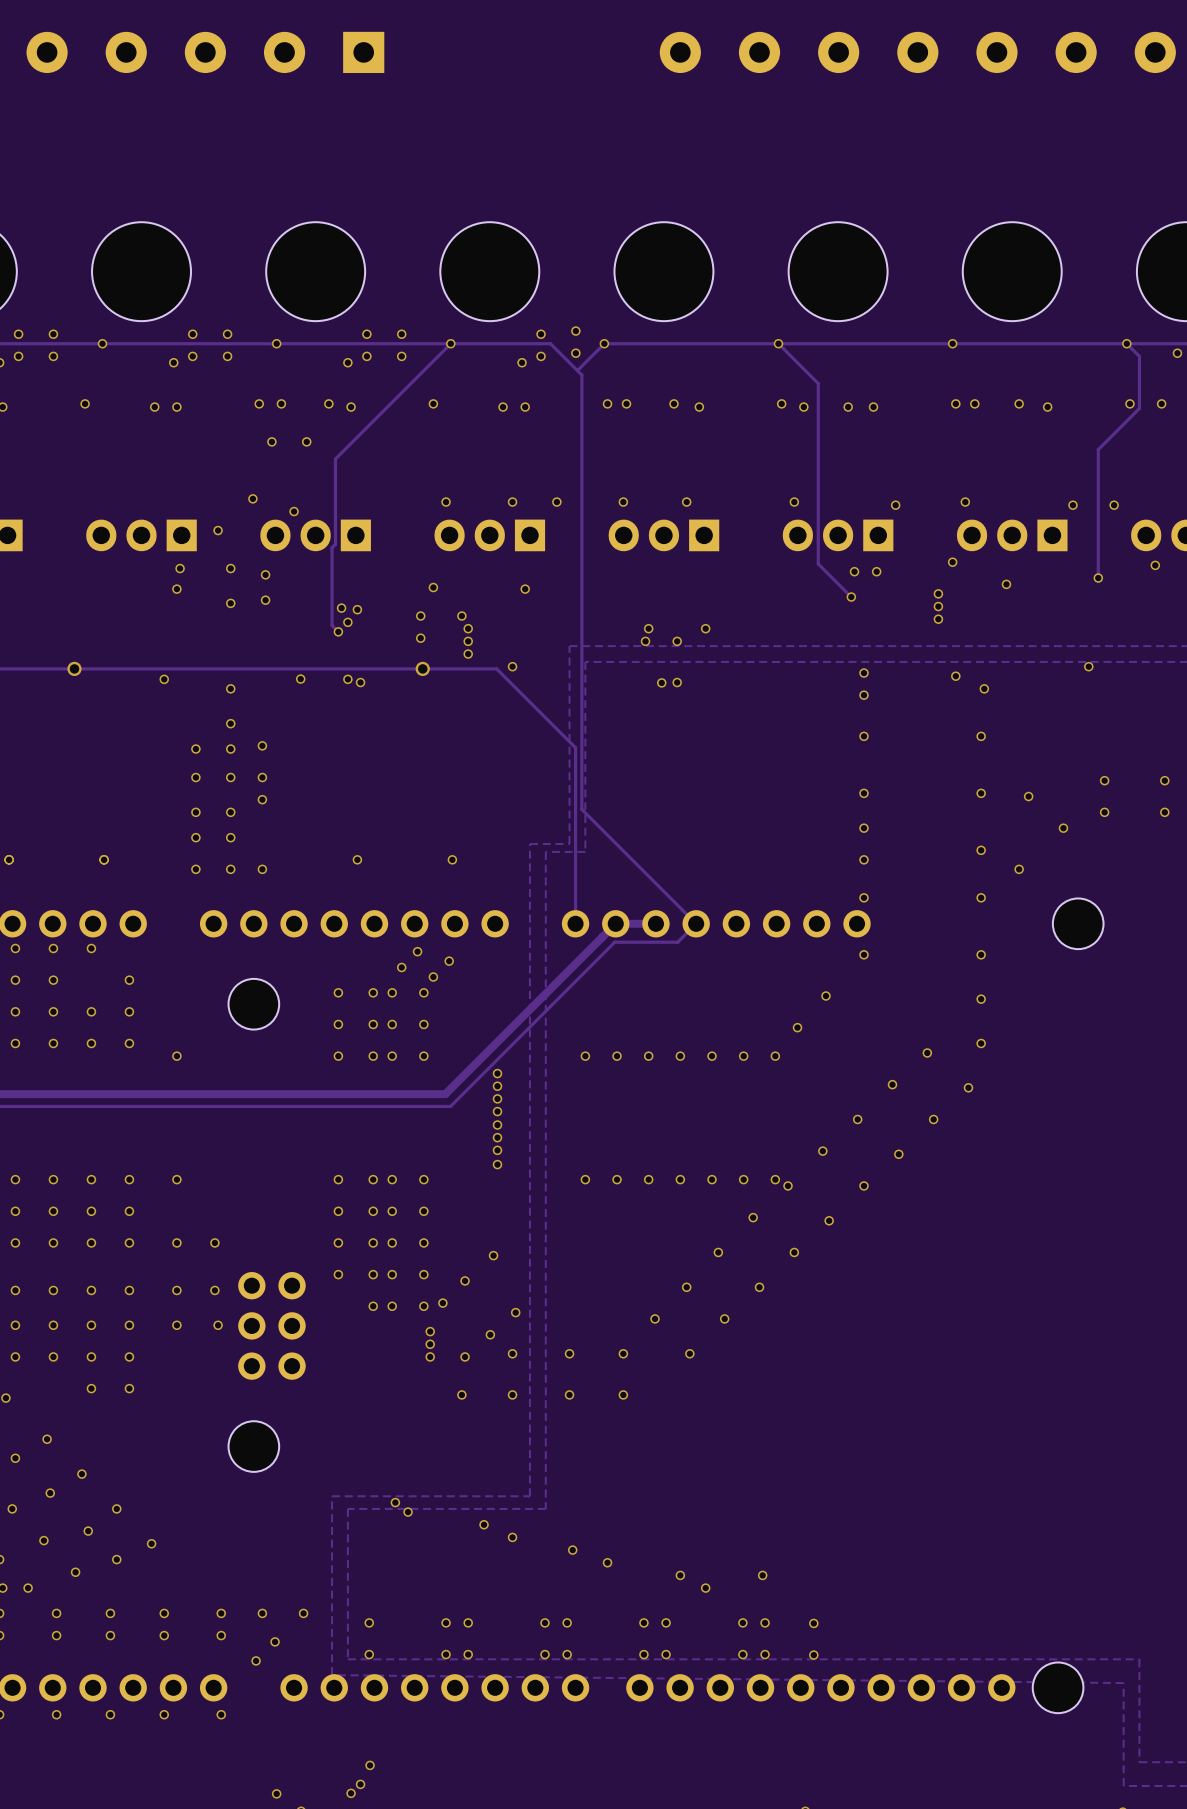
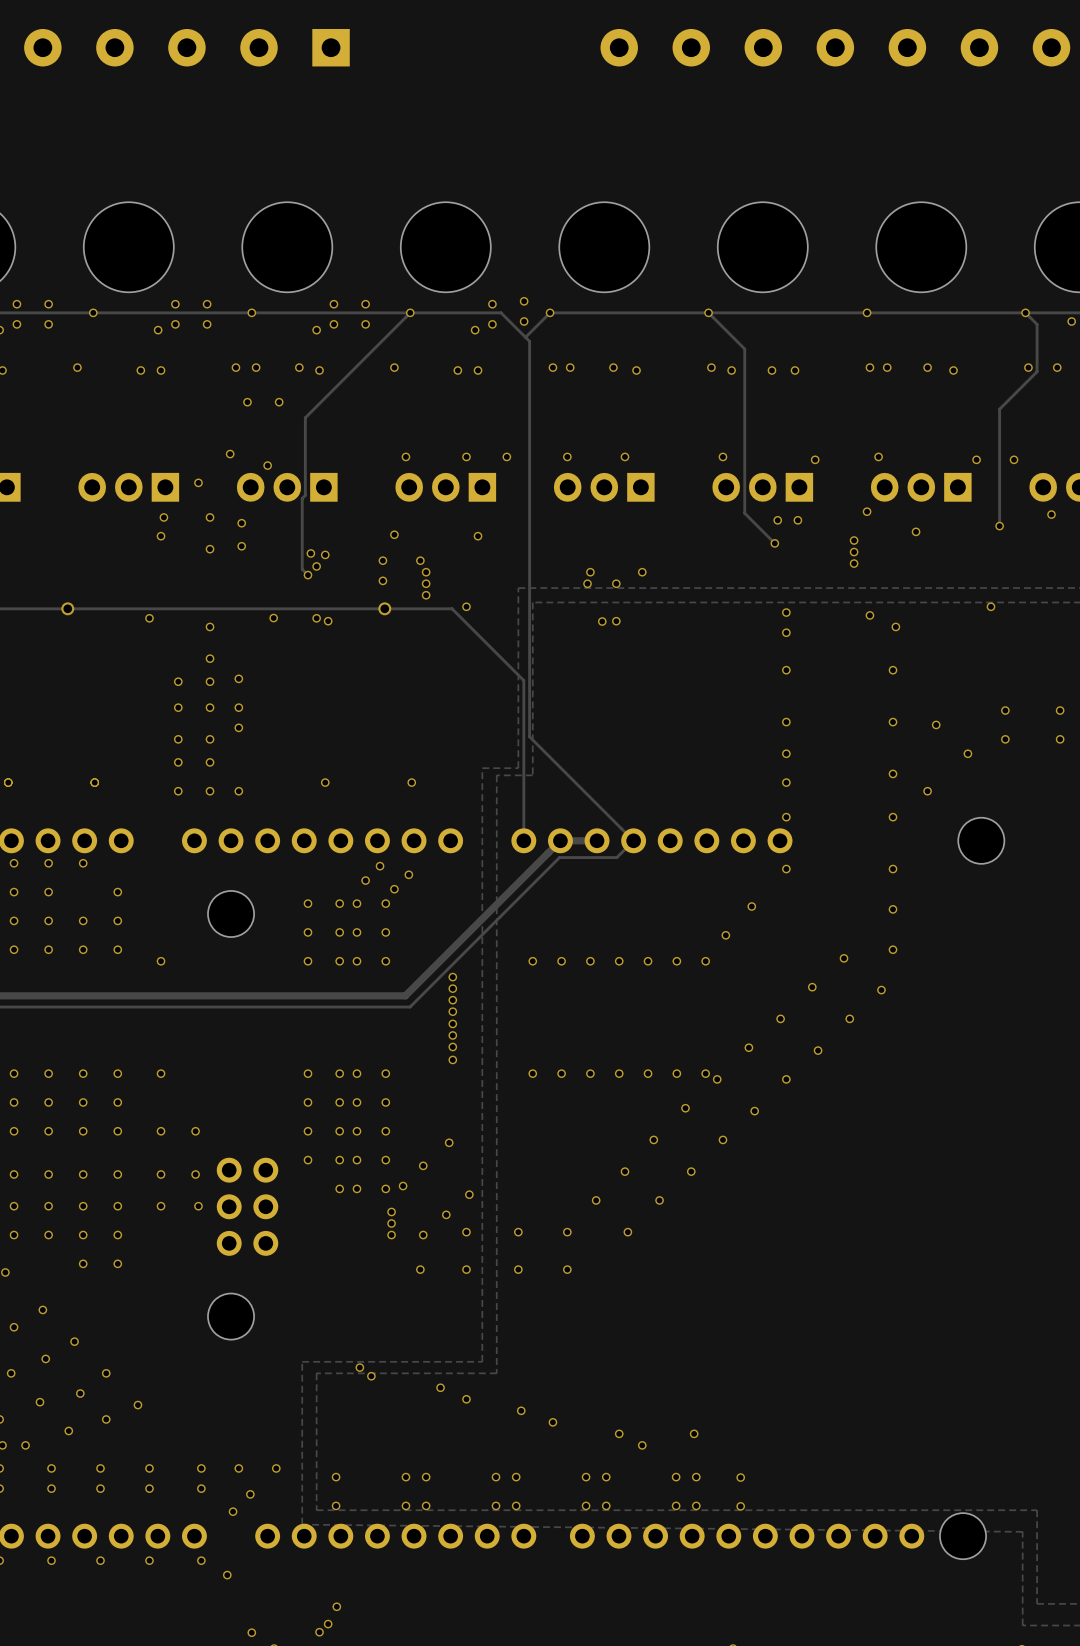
via: none -> (227, 1575)

